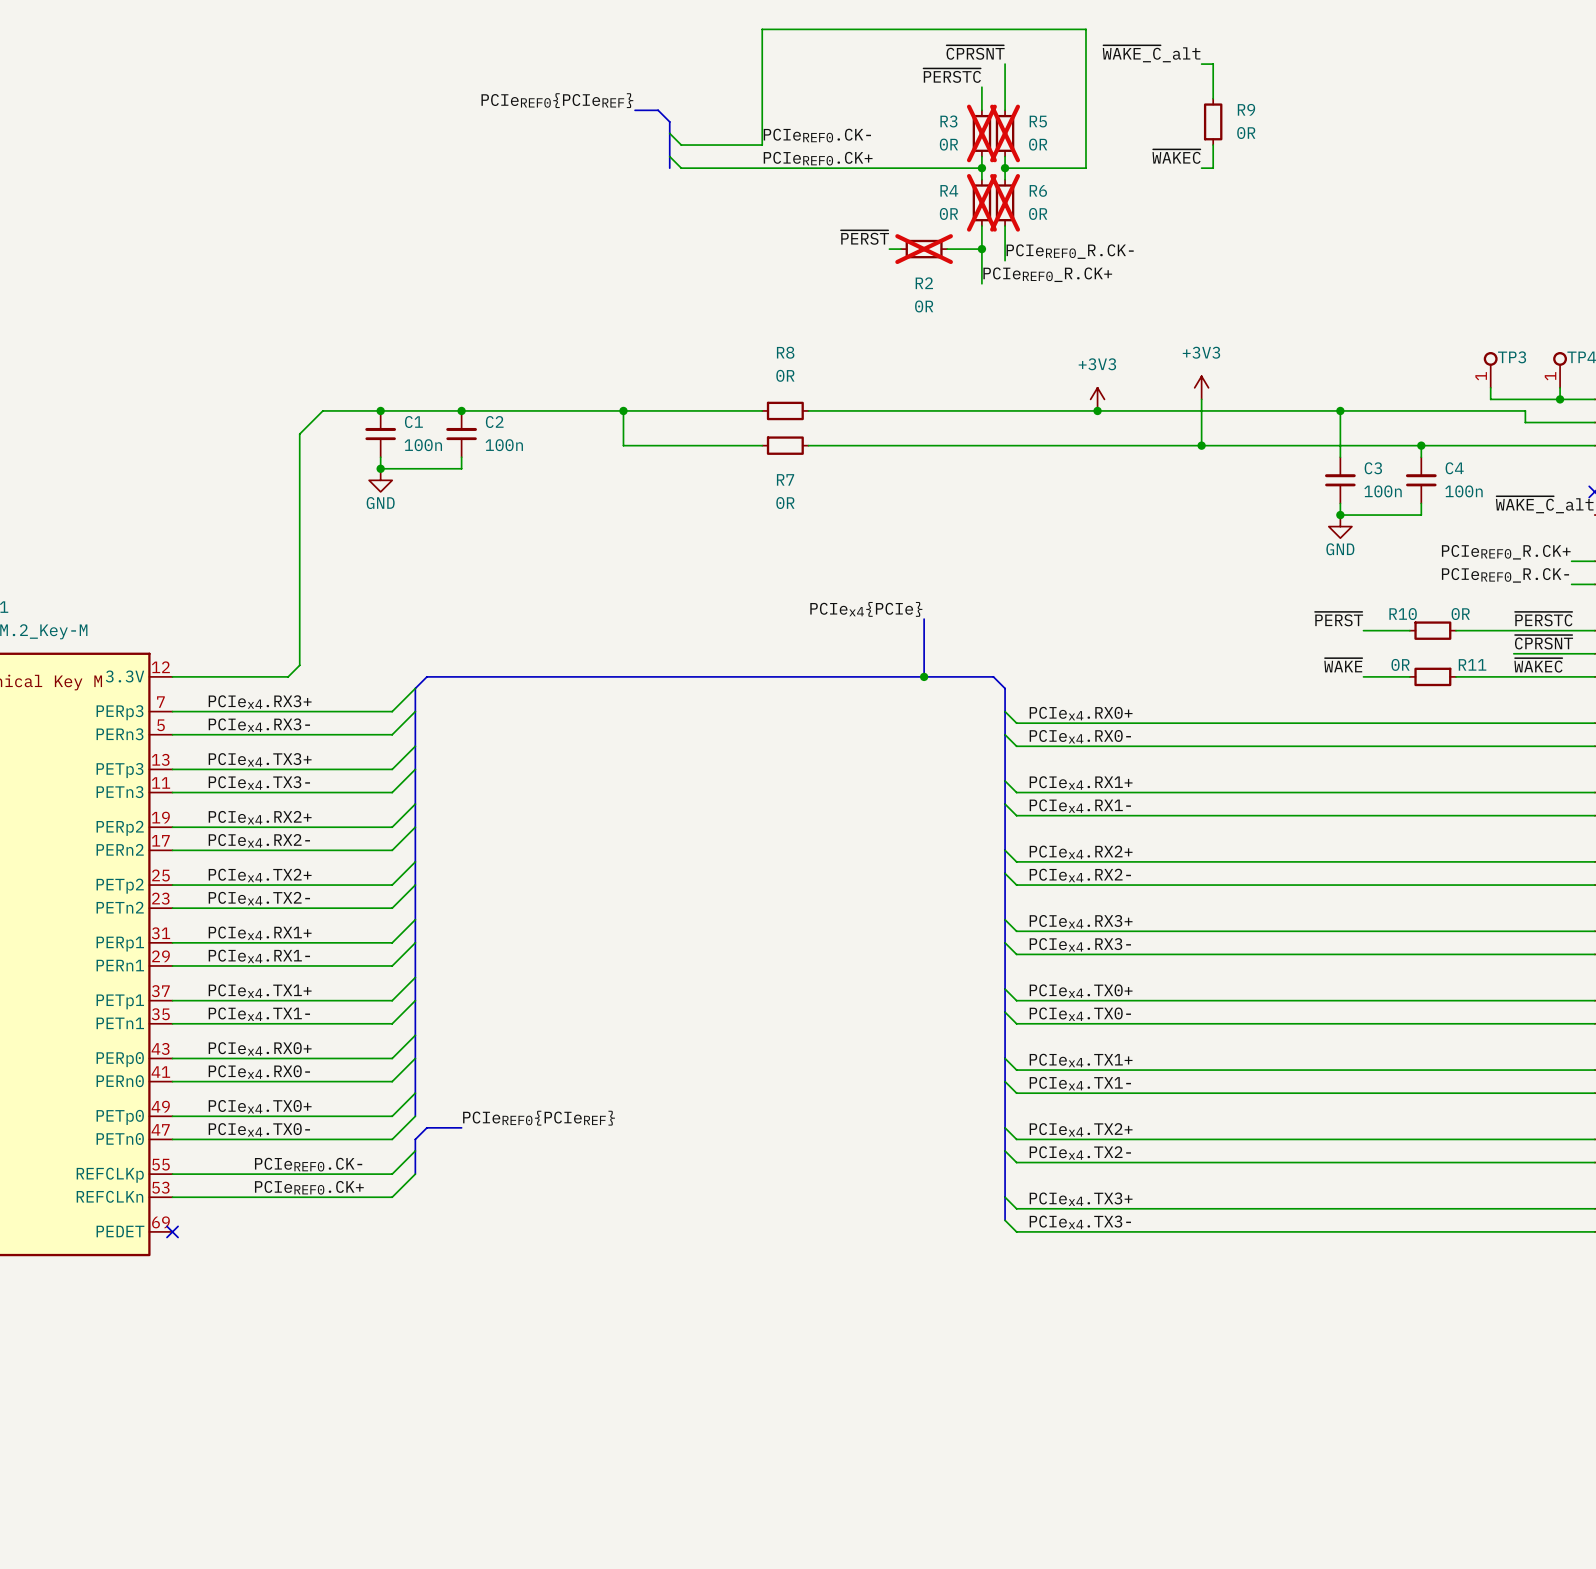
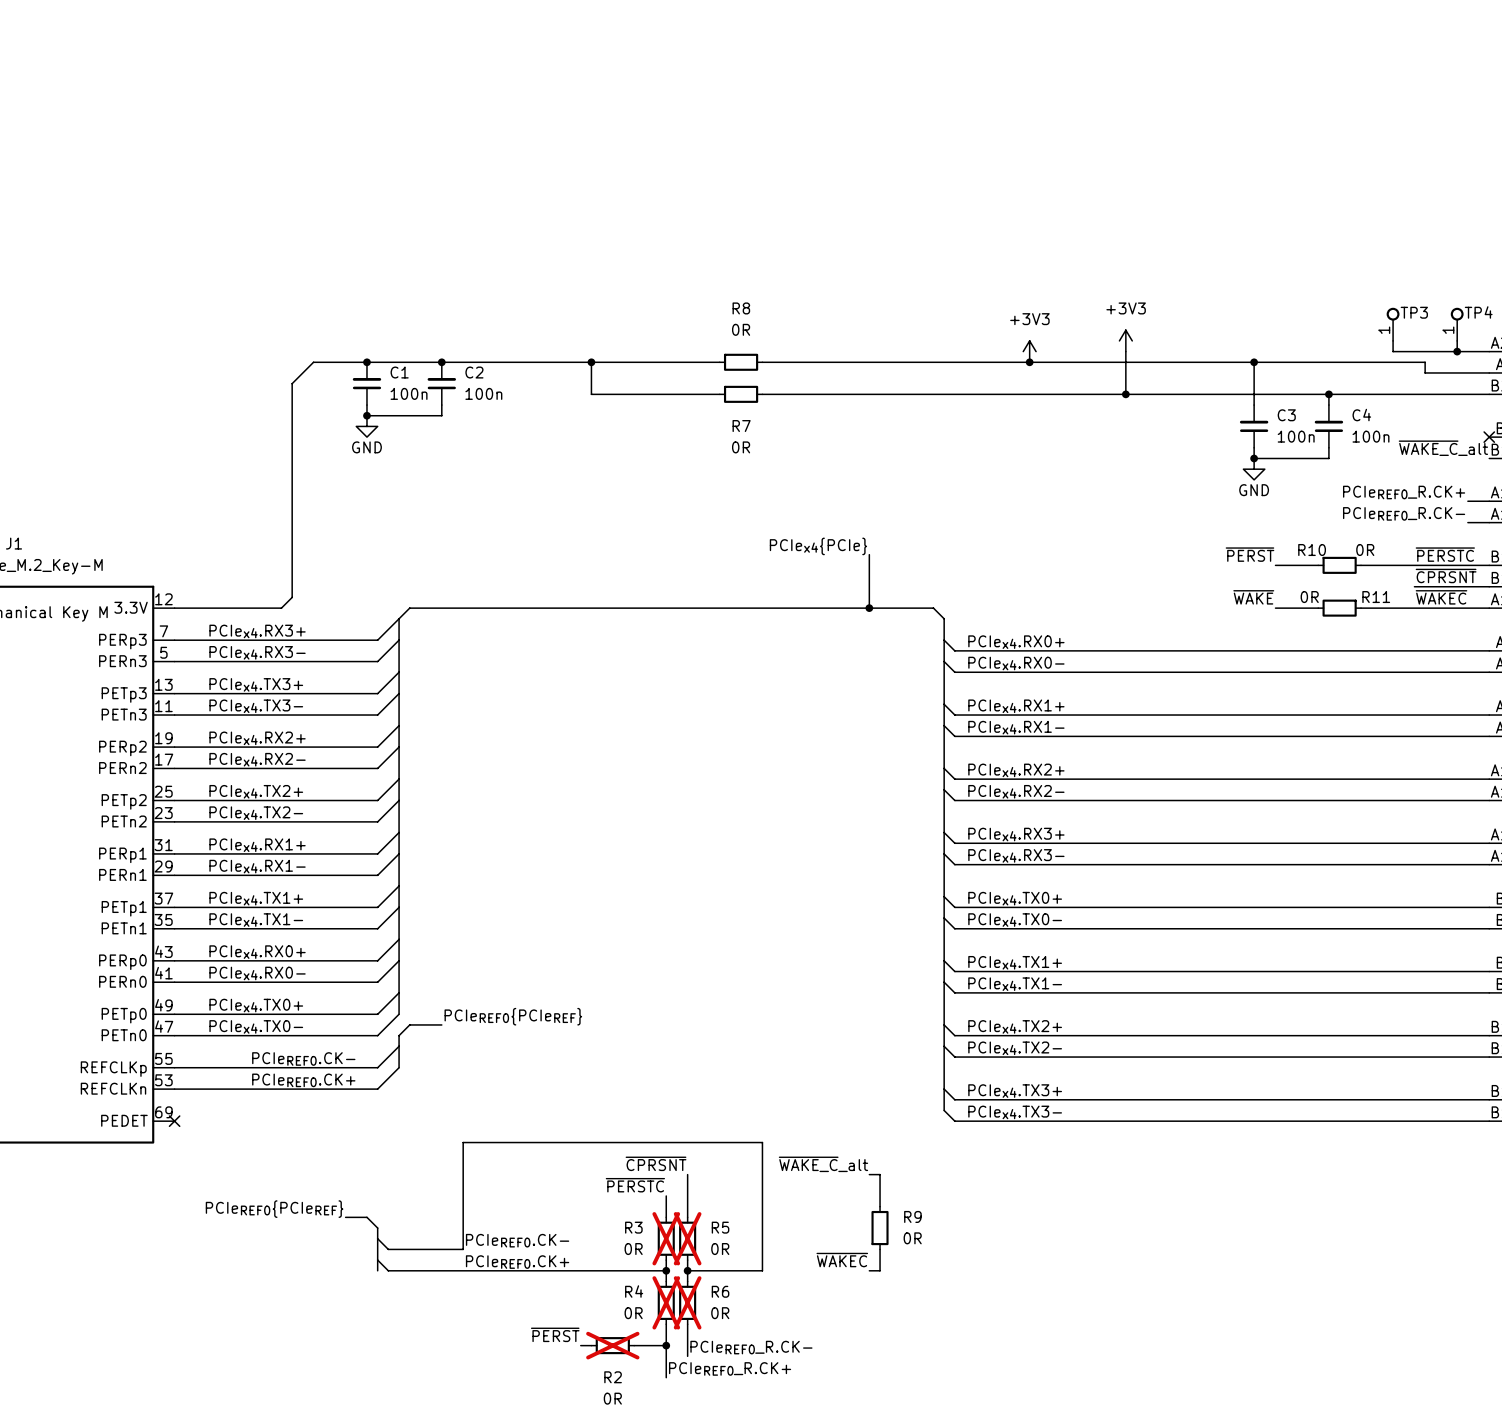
label: ~{CPRSNT} (975, 52) -> none
label: ~{WAKE_C}_alt (1151, 53) -> none
wire: (1005, 64) (1005, 110) -> none
wire: (1201, 64) (1213, 64) (1213, 98) -> none
label: ~{PERSTC} (952, 75) -> none
wire: (981, 87) (981, 110) -> none
label: PCIeREF0{PCIeREF} (557, 100) -> none
bus: (635, 110) (658, 110) (669, 121) (669, 168) -> none
R9 position: (1213, 121) -> (880, 1228)
wire: (669, 133) (681, 145) (762, 145) (762, 29) (1085, 29) (1085, 168) (1005, 168) -> none
R3 position: (981, 133) -> (666, 1238)
R5 position: (1005, 133) -> (687, 1238)
label: PCIeREF0.CK- (817, 135) -> none
wire: (1213, 145) (1213, 168) (1201, 168) -> none
wire: (669, 156) (681, 168) (981, 168) -> none
wire: (981, 156) (981, 179) -> none
wire: (1005, 156) (1005, 179) -> none
label: ~{WAKEC} (1176, 156) -> none
label: PCIeREF0.CK+ (818, 158) -> none
junction: (981, 168) -> none
junction: (1005, 168) -> none
R4 position: (981, 202) -> (666, 1302)
R6 position: (1005, 202) -> (687, 1302)
wire: (981, 225) (981, 283) -> none
wire: (1005, 225) (1005, 260) -> none
label: ~{PERST} (864, 237) -> none
wire: (889, 249) (900, 249) -> none
R2 position: (924, 249) -> (612, 1345)
wire: (947, 249) (981, 249) -> none
junction: (981, 249) -> none
label: PCIeREF0_R.CK- (1070, 251) -> none
label: PCIeREF0_R.CK+ (1047, 274) -> none
label: none -> ~{CPRSNT} (656, 1163)
label: none -> ~{WAKE_C}_alt (823, 1164)
wire: none -> (687, 1174) (687, 1217)
wire: none -> (869, 1174) (880, 1174) (880, 1206)
label: none -> ~{PERSTC} (635, 1185)
wire: none -> (666, 1195) (666, 1217)
label: none -> PCIeREF0{PCIeREF} (274, 1209)
bus: none -> (345, 1217) (366, 1217) (377, 1228) (377, 1270)
wire: none -> (377, 1238) (388, 1249) (463, 1249) (463, 1142) (762, 1142) (762, 1270) (687, 1270)
label: none -> PCIeREF0.CK- (517, 1240)
wire: none -> (880, 1249) (880, 1270) (869, 1270)
wire: none -> (377, 1260) (388, 1270) (666, 1270)
wire: none -> (666, 1260) (666, 1281)
wire: none -> (687, 1260) (687, 1281)
label: none -> ~{WAKEC} (842, 1260)
label: none -> PCIeREF0.CK+ (517, 1262)
junction: none -> (666, 1270)
junction: none -> (687, 1270)
wire: none -> (666, 1324) (666, 1377)
wire: none -> (687, 1324) (687, 1356)
label: none -> ~{PERST} (555, 1334)
wire: none -> (580, 1345) (591, 1345)
wire: none -> (634, 1345) (666, 1345)
junction: none -> (666, 1345)
label: none -> PCIeREF0_R.CK- (751, 1347)
label: none -> PCIeREF0_R.CK+ (730, 1368)

